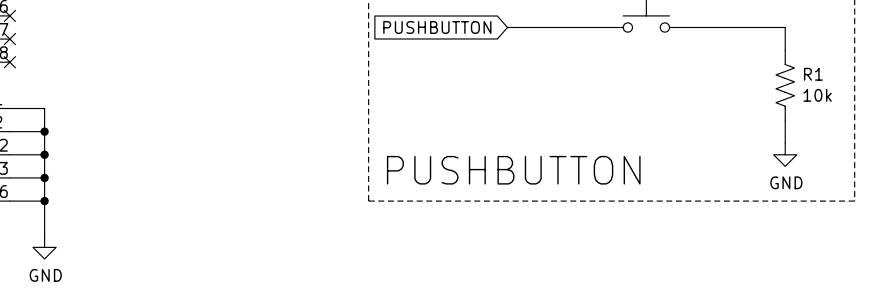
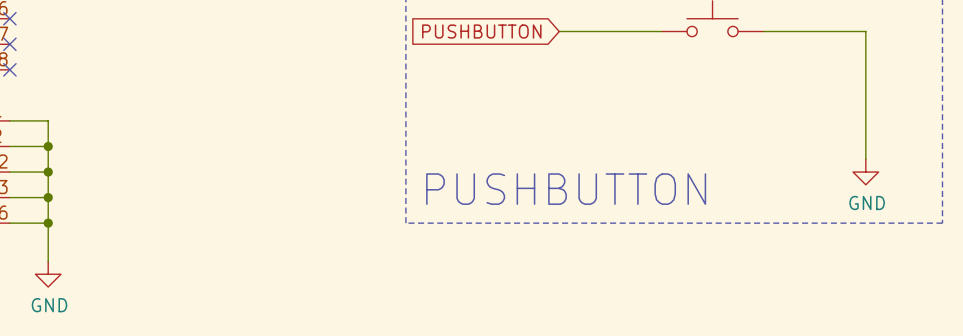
R1: 10k (785, 85) -> none

